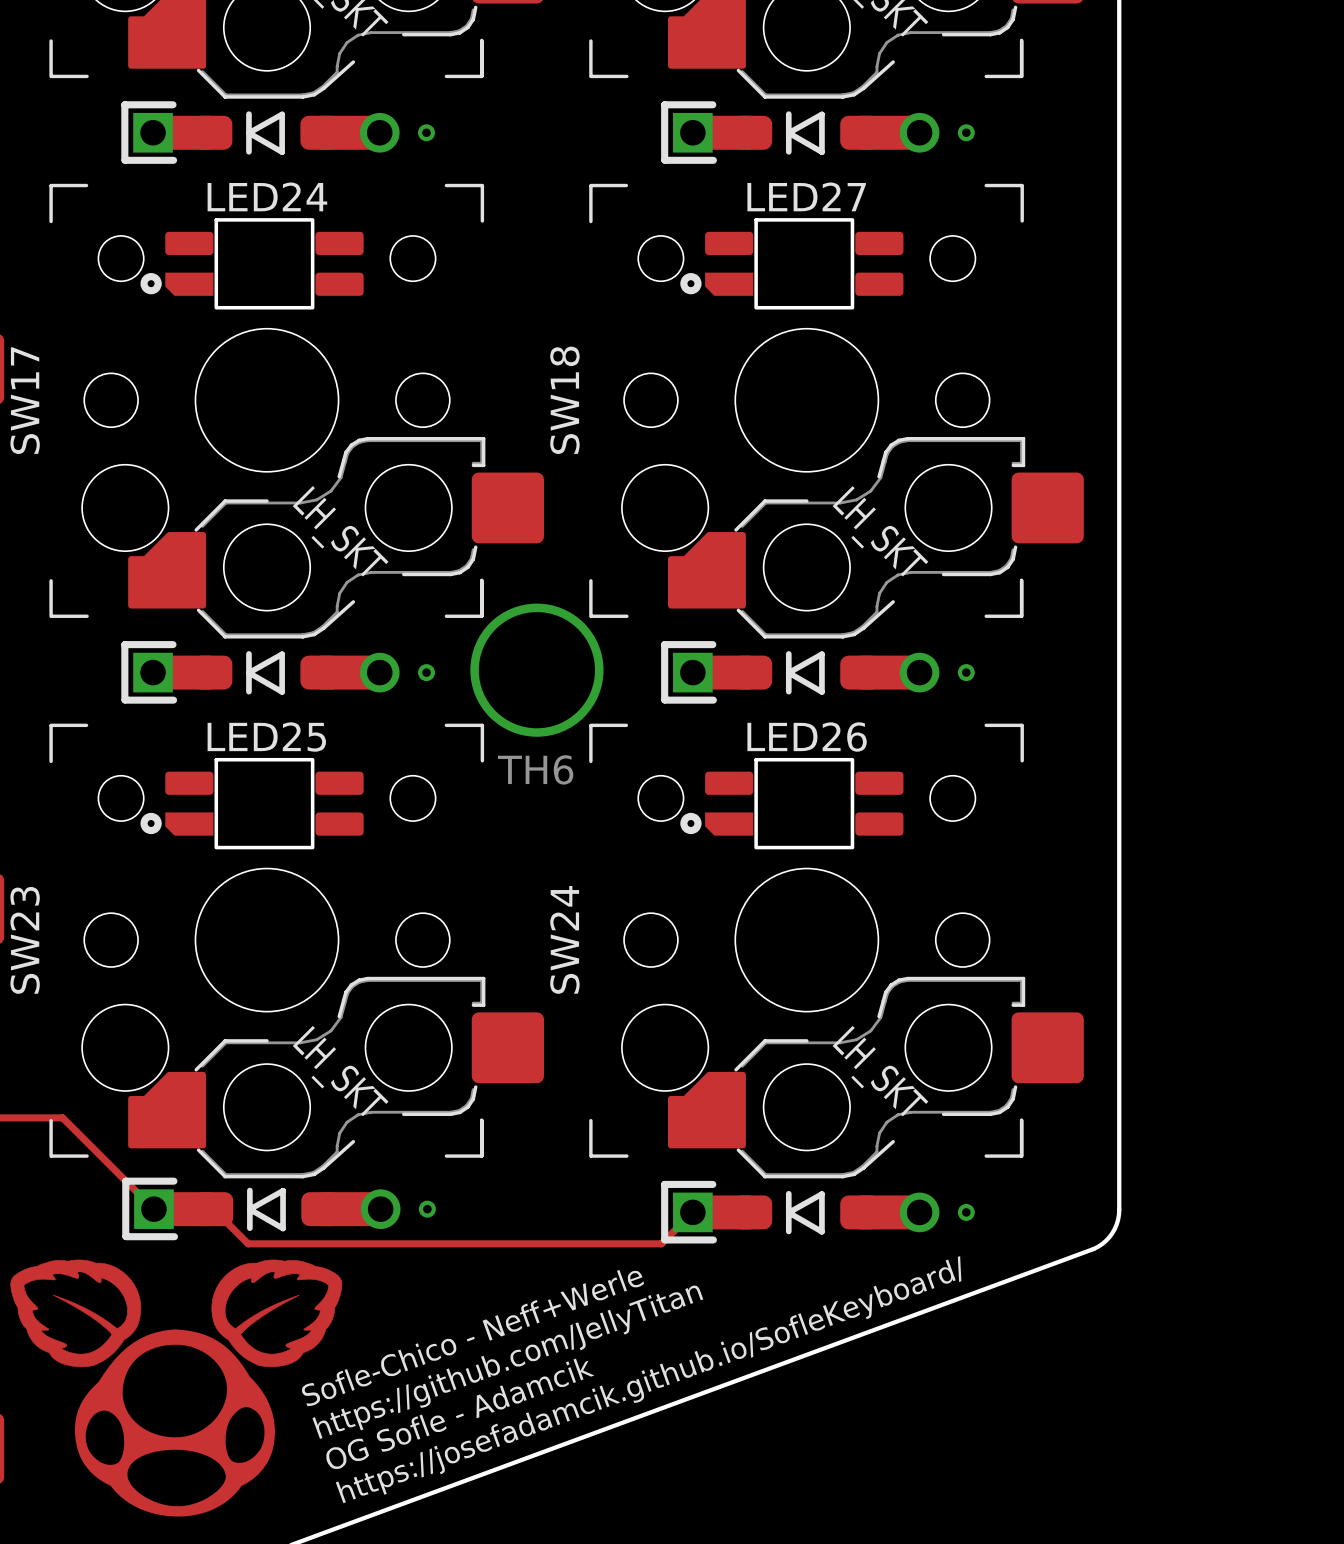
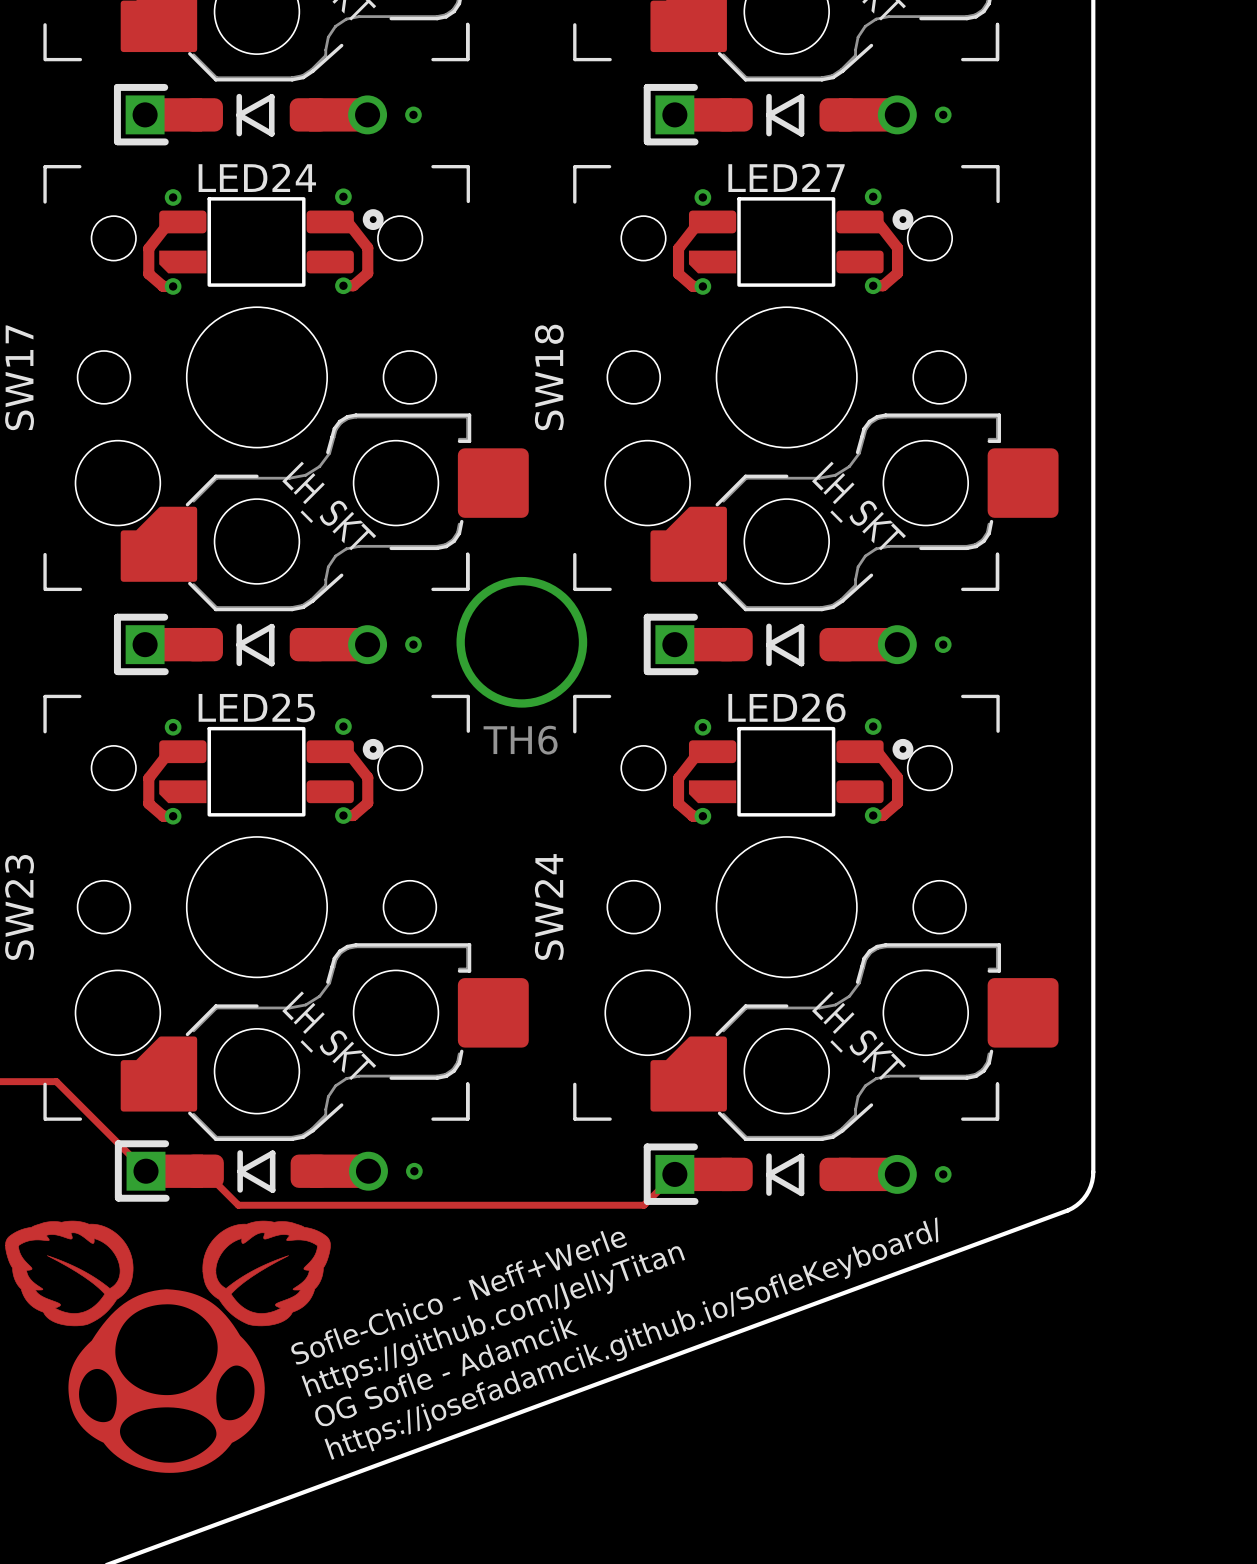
LED24 footprint: [140, 218, 364, 310] -> [143, 188, 384, 295]
LED27 footprint: [680, 218, 904, 310] -> [672, 188, 914, 295]
LED25 footprint: [140, 757, 364, 850] -> [143, 718, 384, 825]
LED26 footprint: [680, 757, 904, 850] -> [672, 718, 914, 825]

